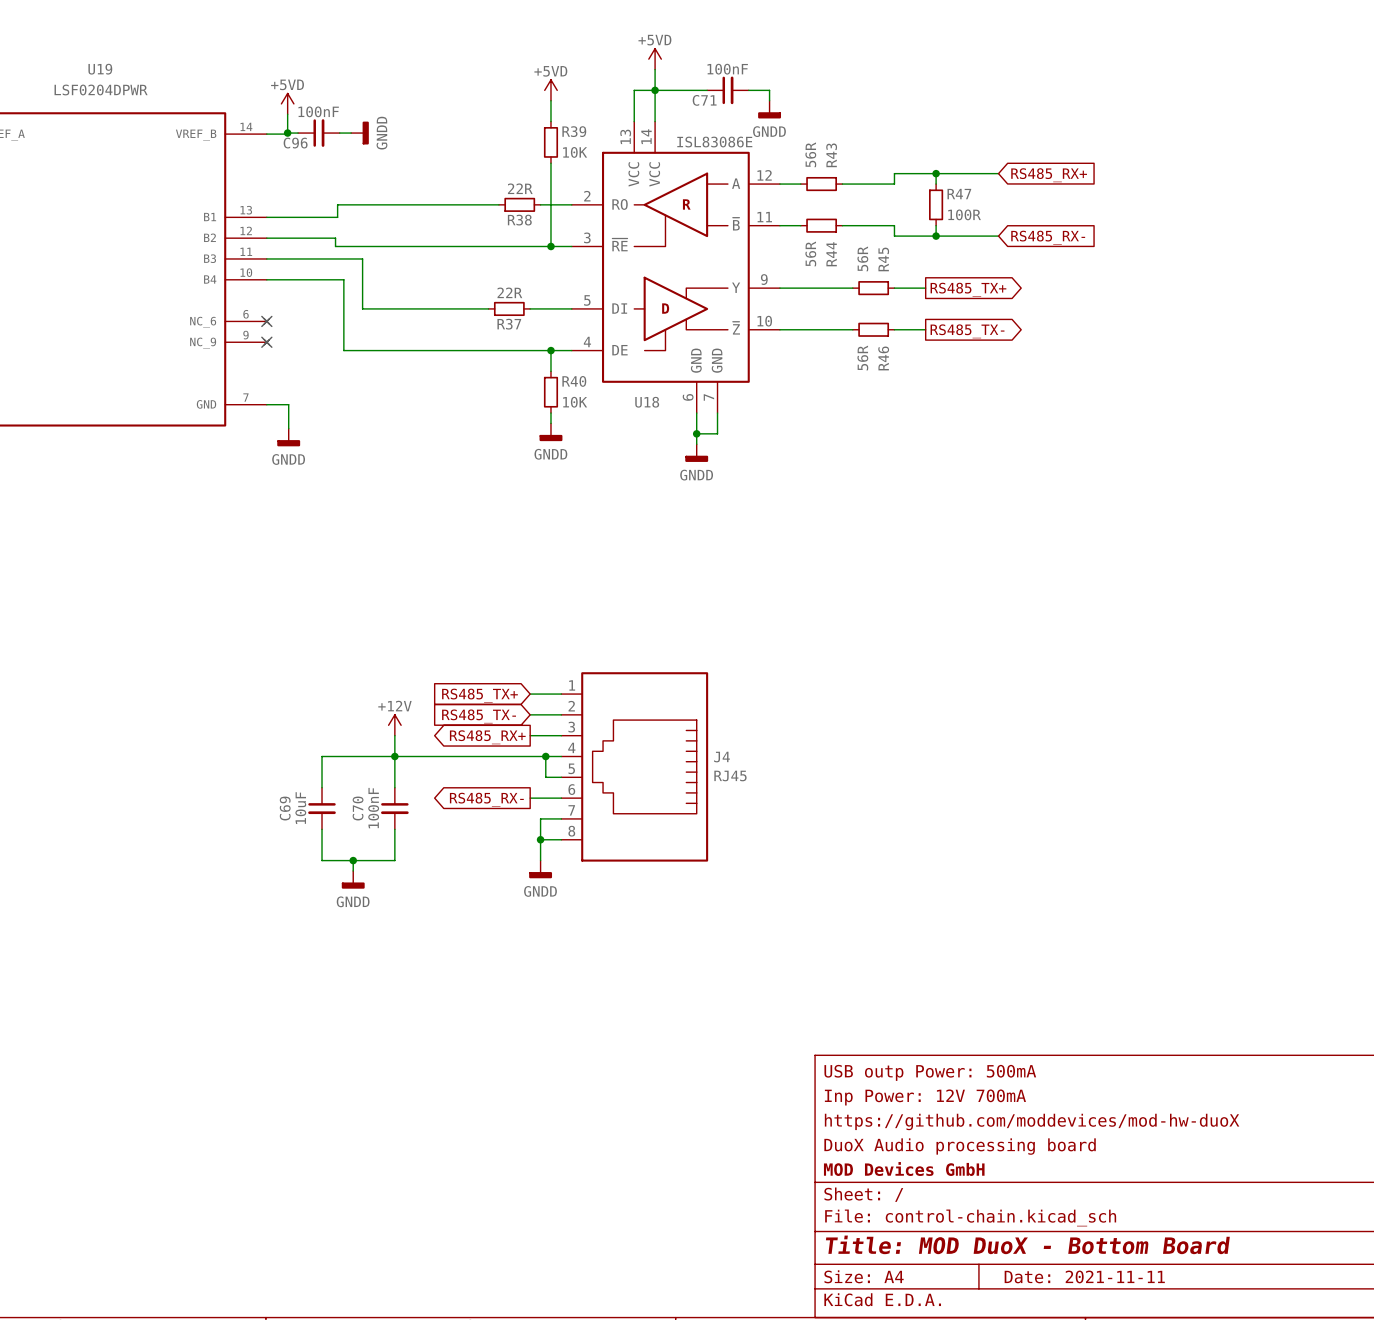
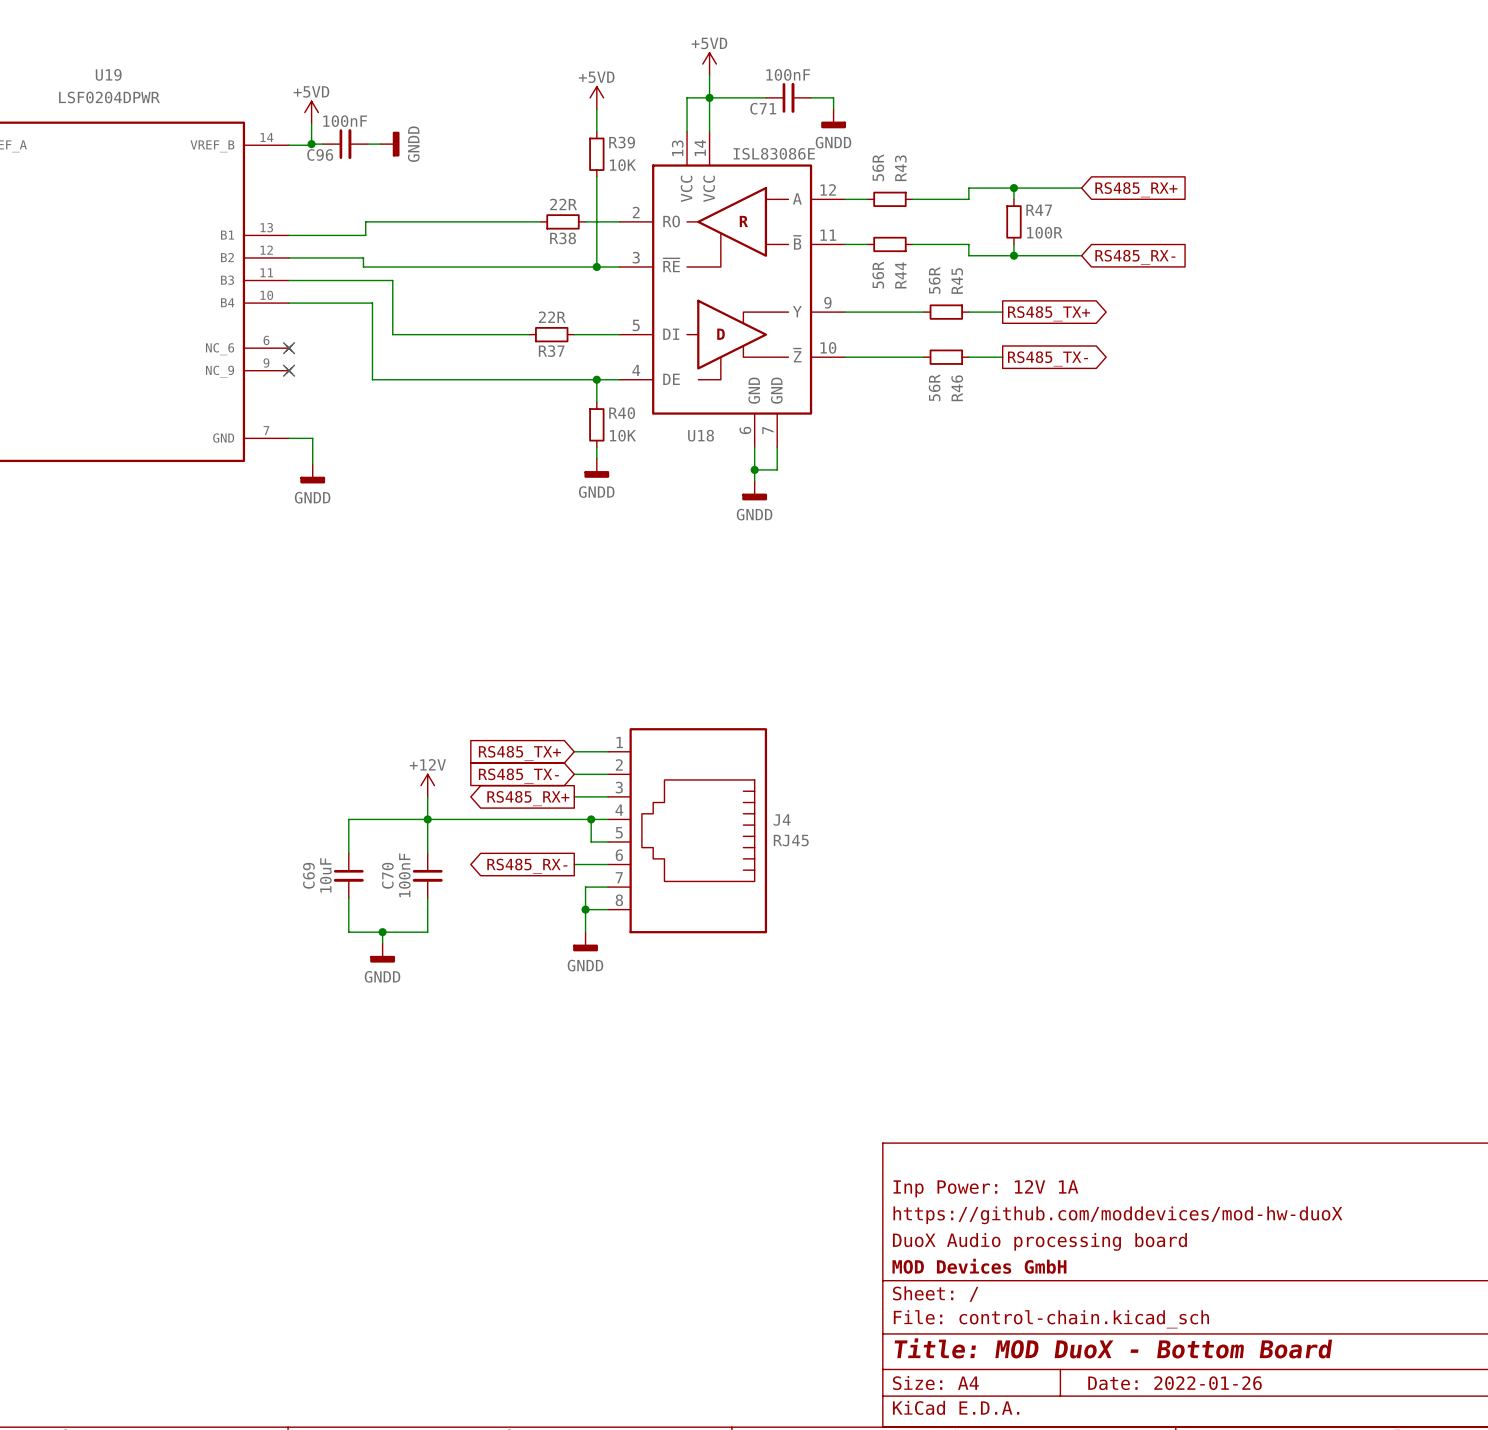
title block: USB outp Power: 500mA (930, 1072) -> none
title block: Inp Power: 12V 700mA (925, 1097) -> Inp Power: 12V 1A (985, 1188)
title block: Date: 2021-11-11 (1084, 1276) -> Date: 2022-01-26 (1175, 1383)

